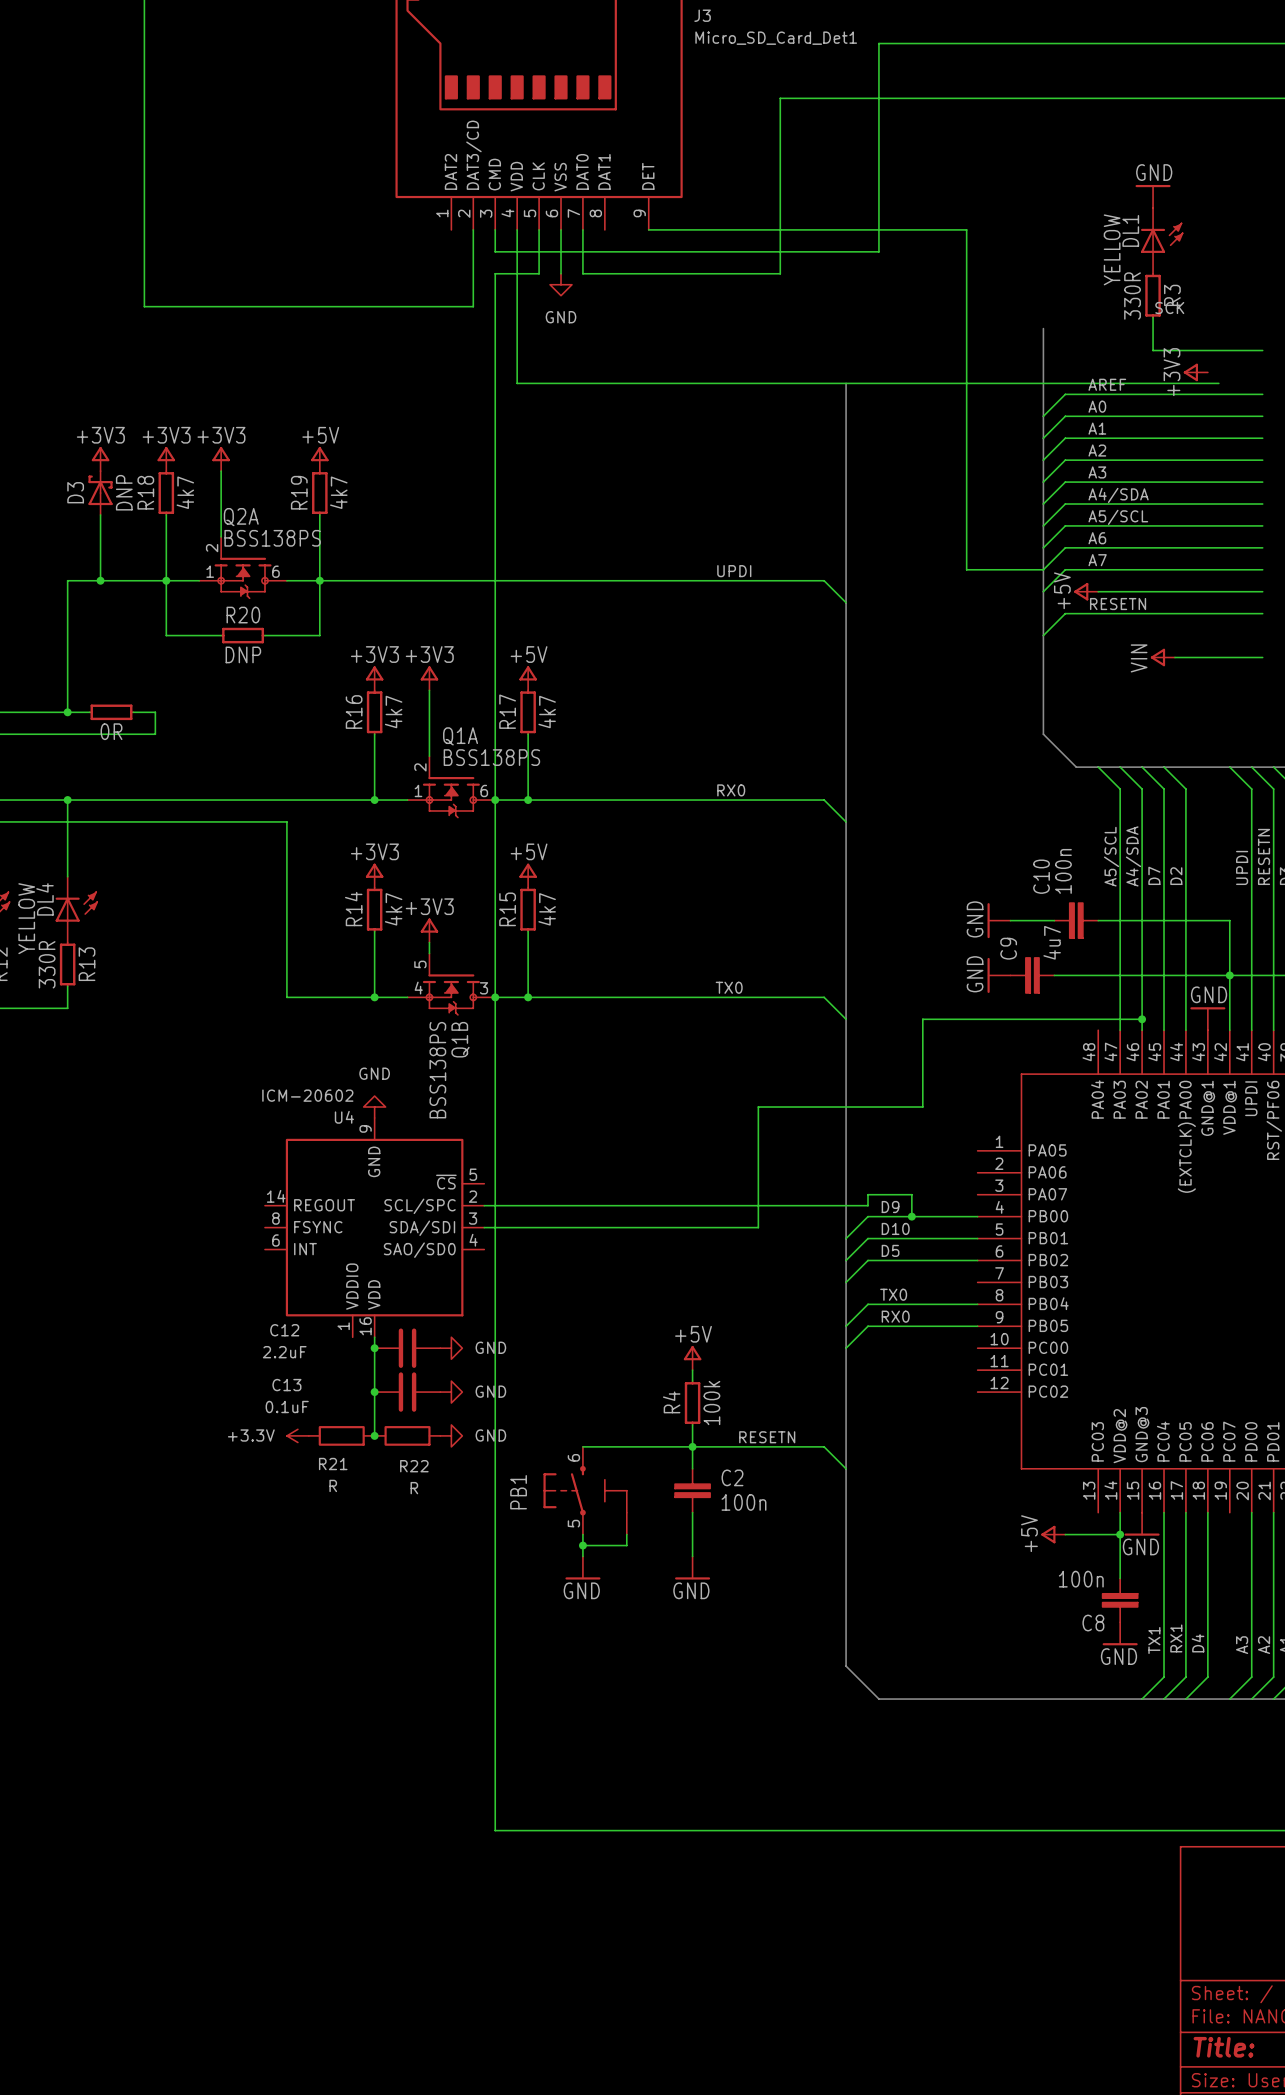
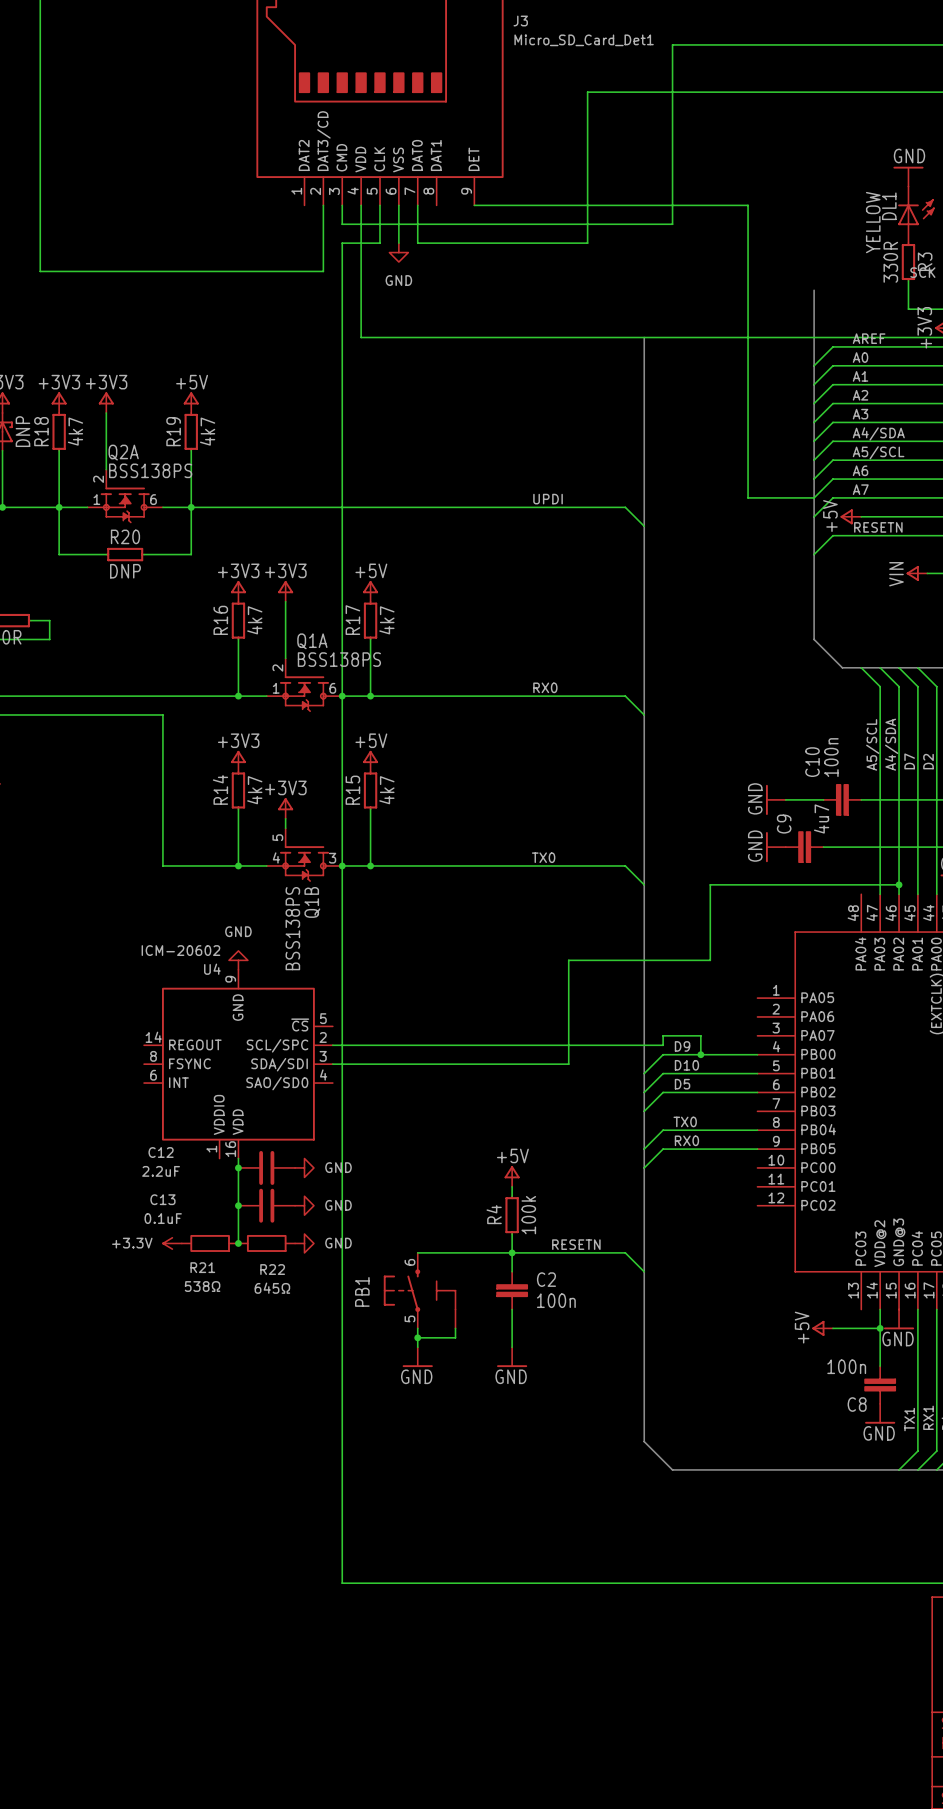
R21 value: R (333, 1485) -> 538Ω (202, 1286)
R22 value: R (414, 1488) -> 645Ω (272, 1288)

